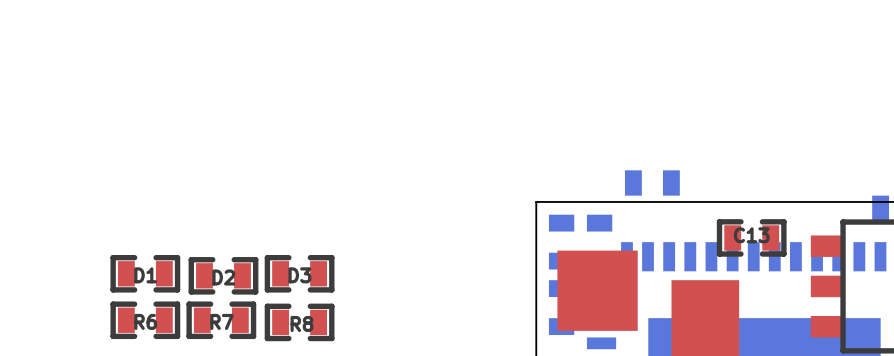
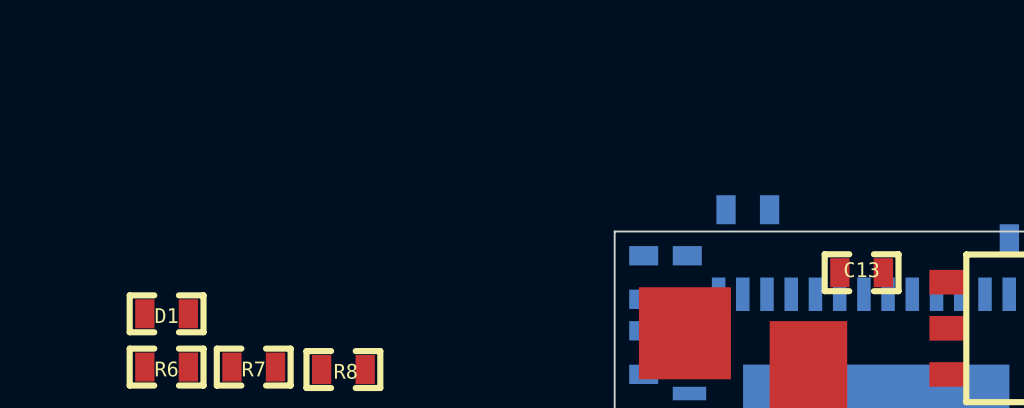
D3: (299, 273) -> none
D2: (223, 275) -> none

